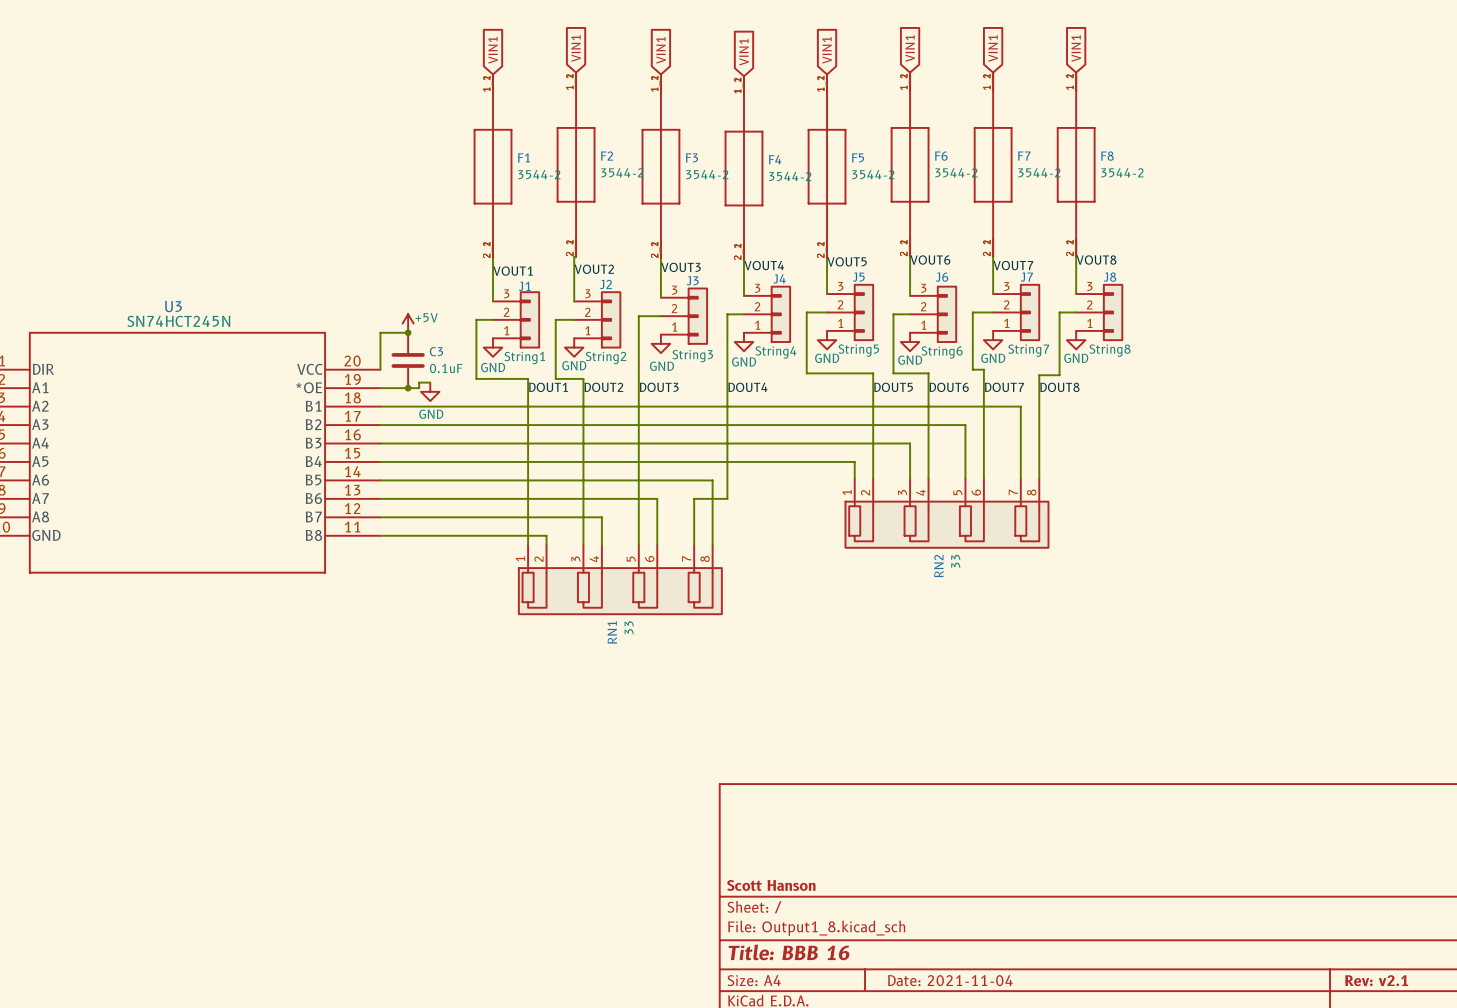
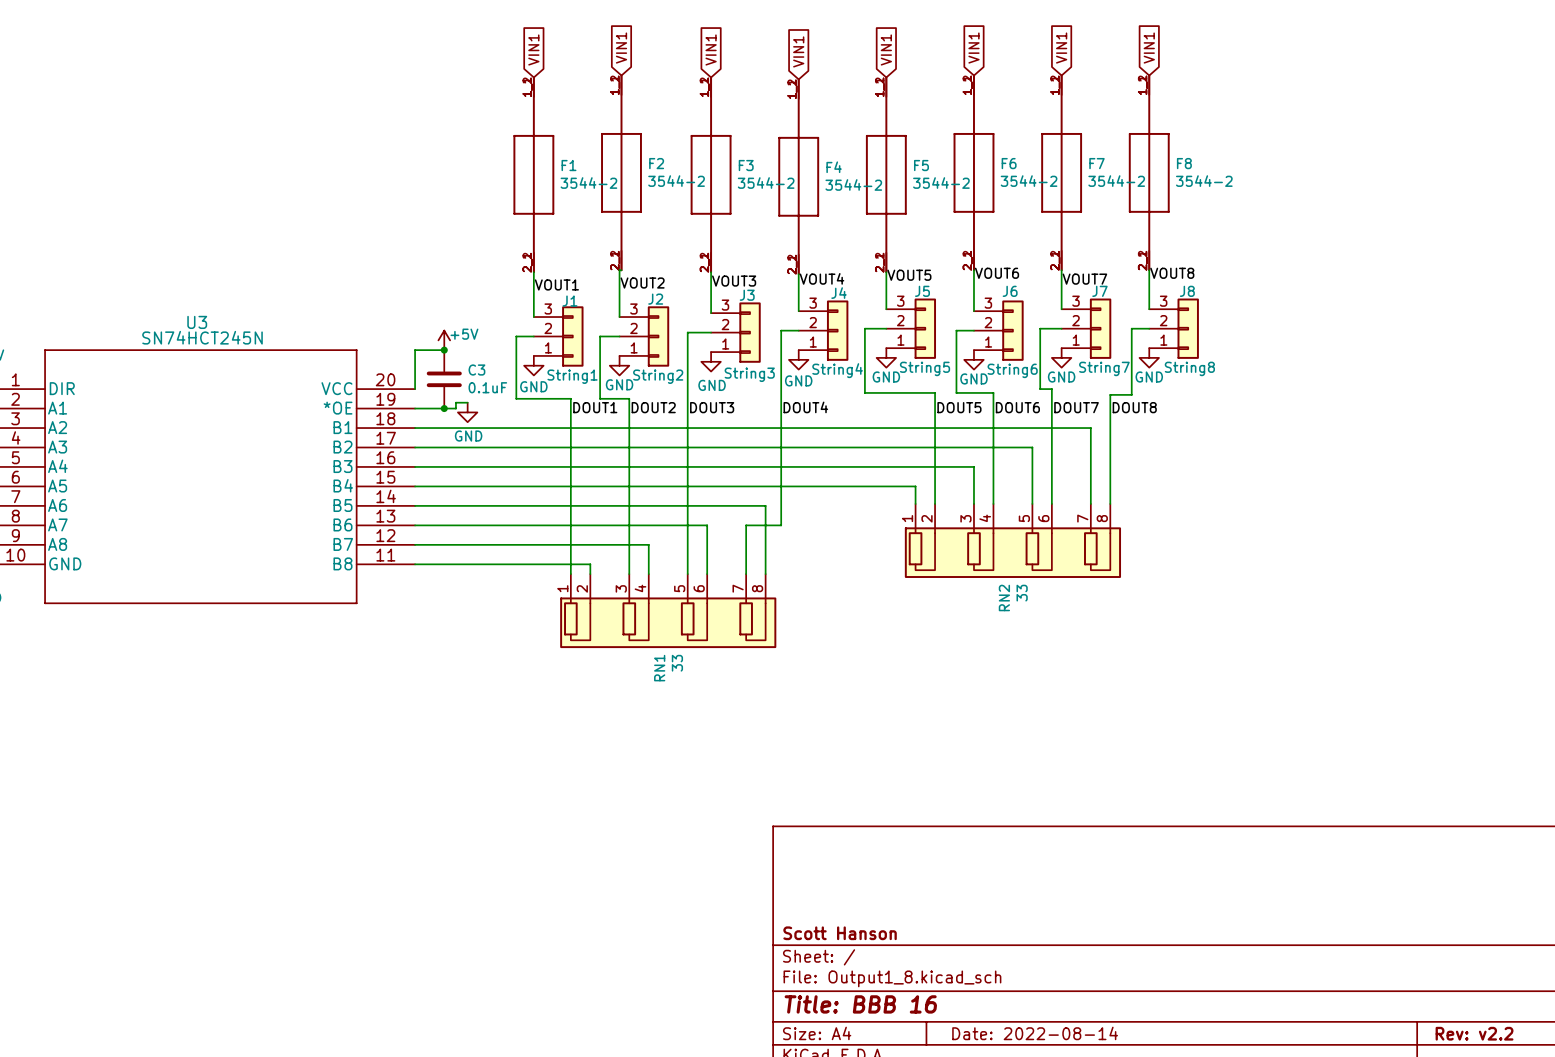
title block: Date: 2021-11-04 (950, 980) -> Date: 2022-08-14 (1035, 1033)
title block: Rev: v2.1 (1376, 980) -> Rev: v2.2 (1474, 1033)

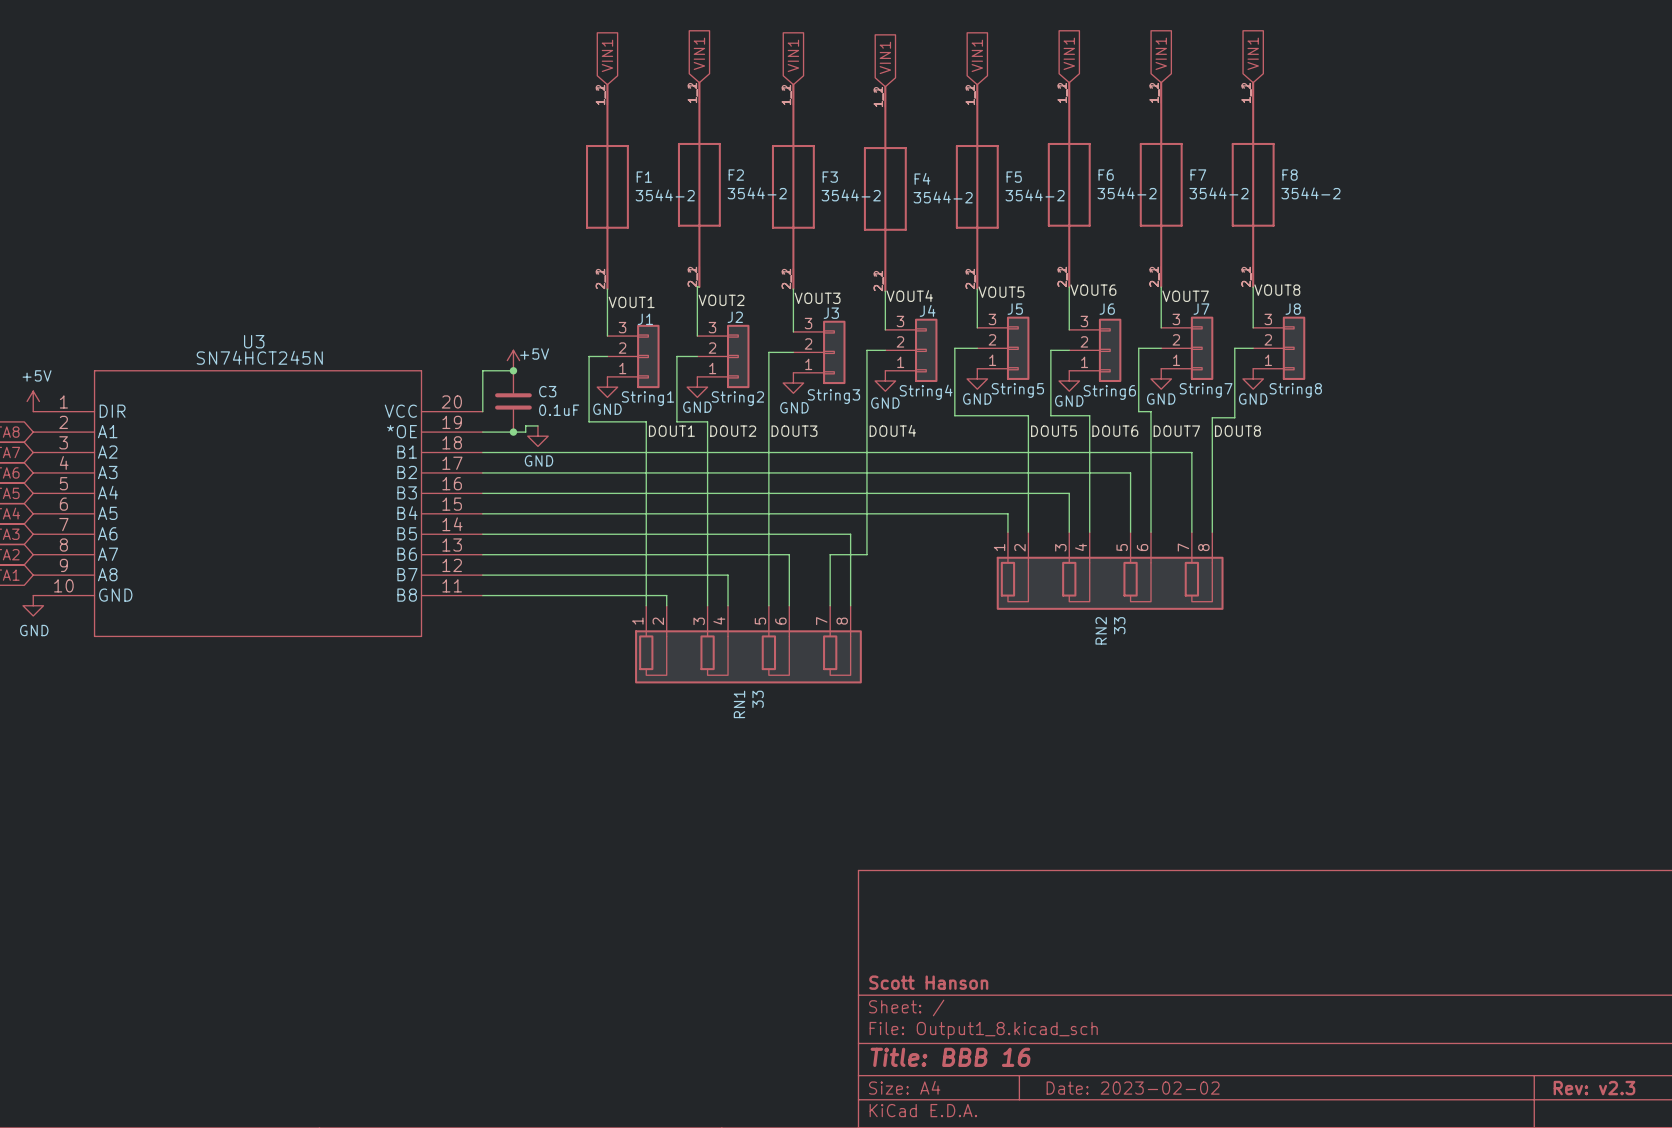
title block: Date: 2022-08-14 (1035, 1033) -> Date: 2023-02-02 (1133, 1088)
title block: Rev: v2.2 (1474, 1033) -> Rev: v2.3 (1594, 1088)

